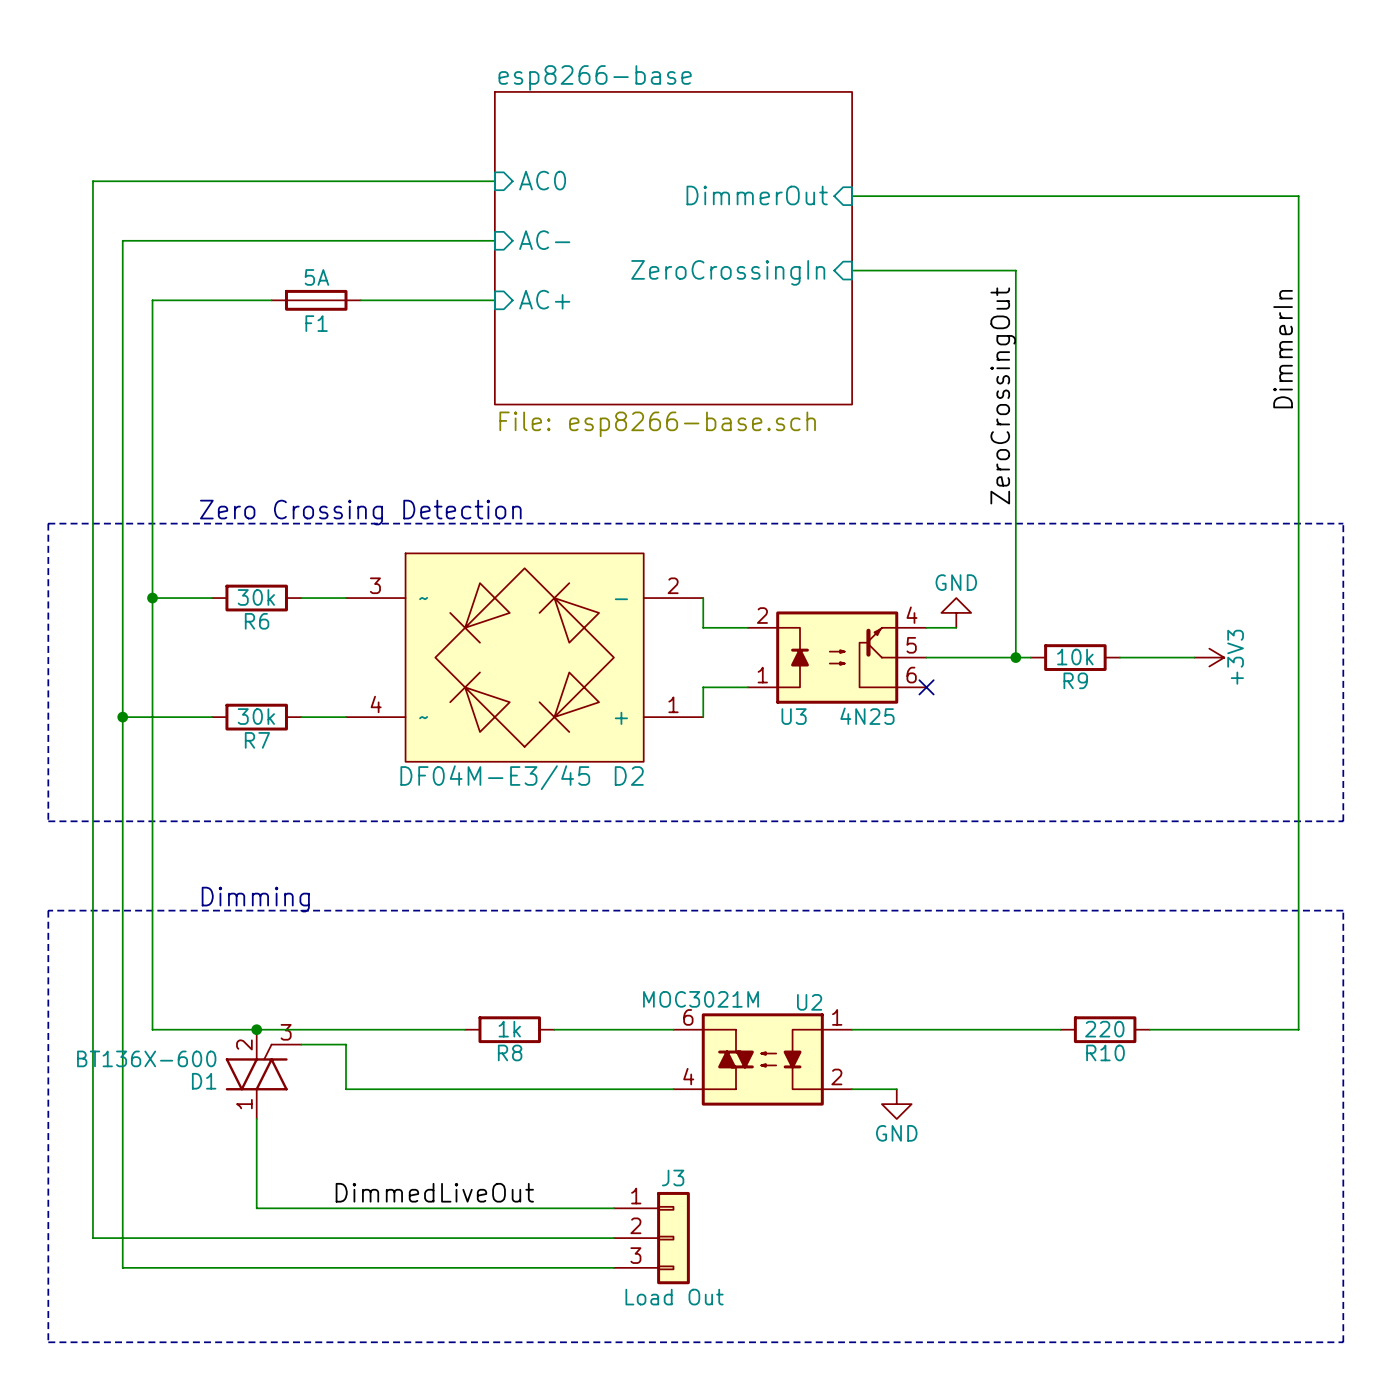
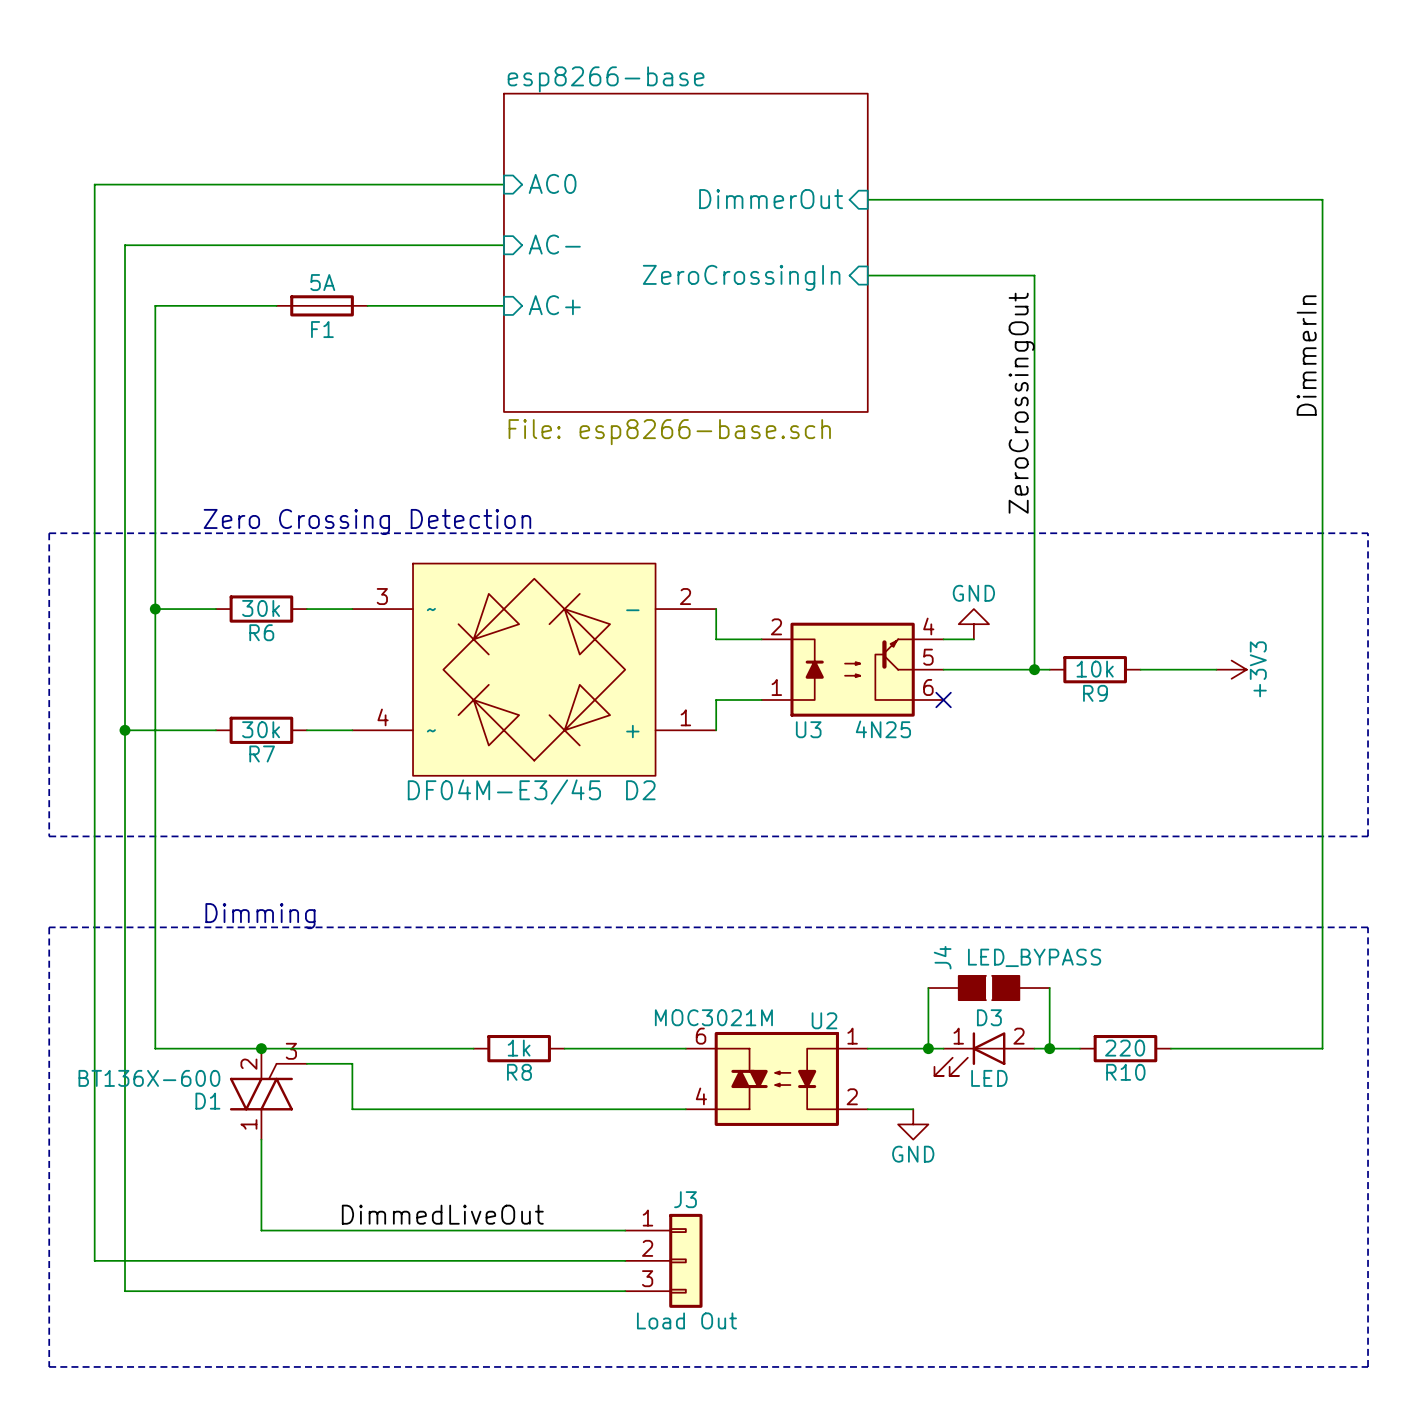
wire: none -> (928, 988) (928, 1048)
J4: none -> LED_BYPASS (989, 988)
wire: none -> (1049, 988) (1049, 1048)
junction: none -> (928, 1048)
junction: none -> (1049, 1048)
D3: none -> LED (984, 1054)

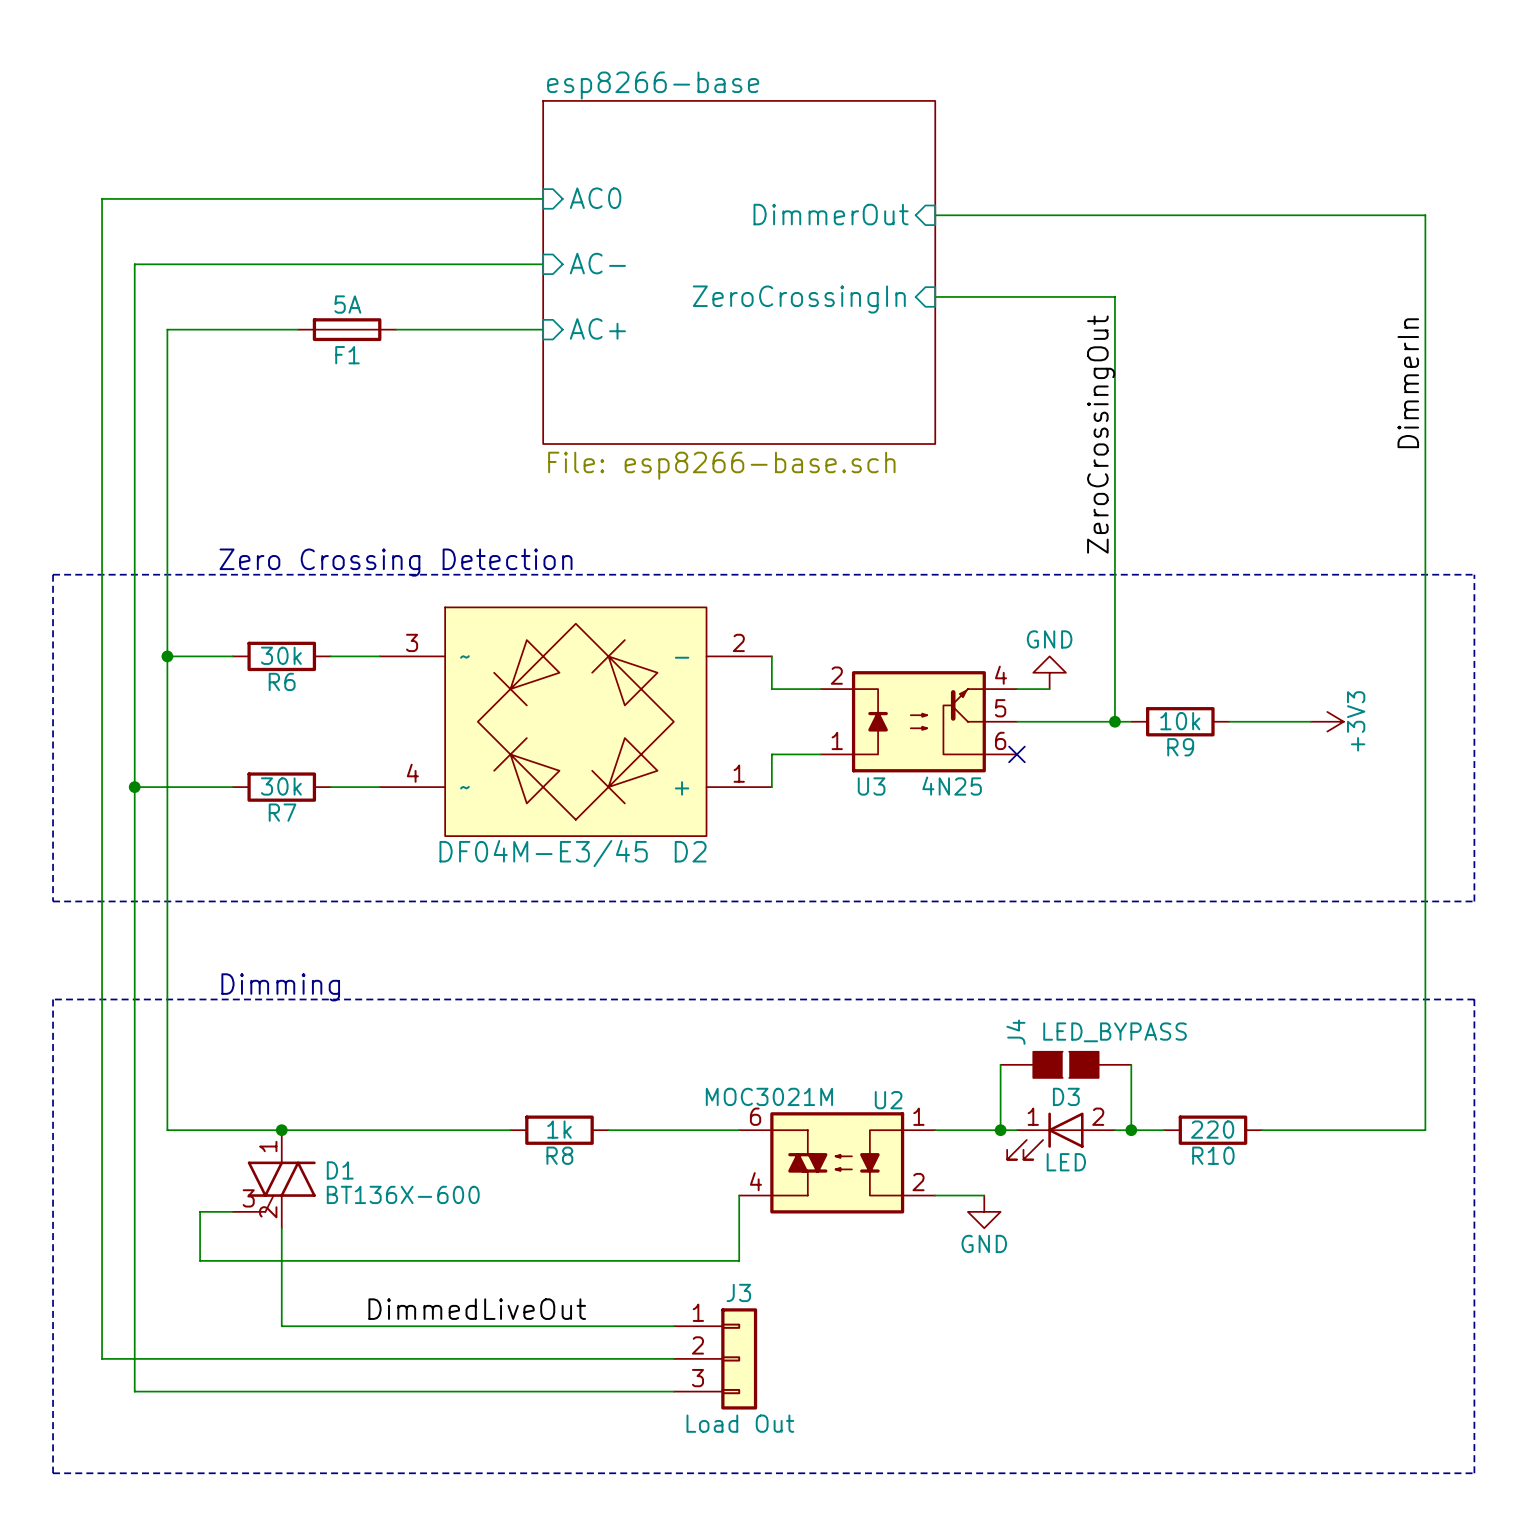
wire: (306, 1063) (352, 1063) (352, 1109) (685, 1109) -> (232, 1211) (200, 1211) (200, 1260) (739, 1260) (739, 1195)
D1 rotation: 0° (261, 1087) -> 180° (281, 1186)

